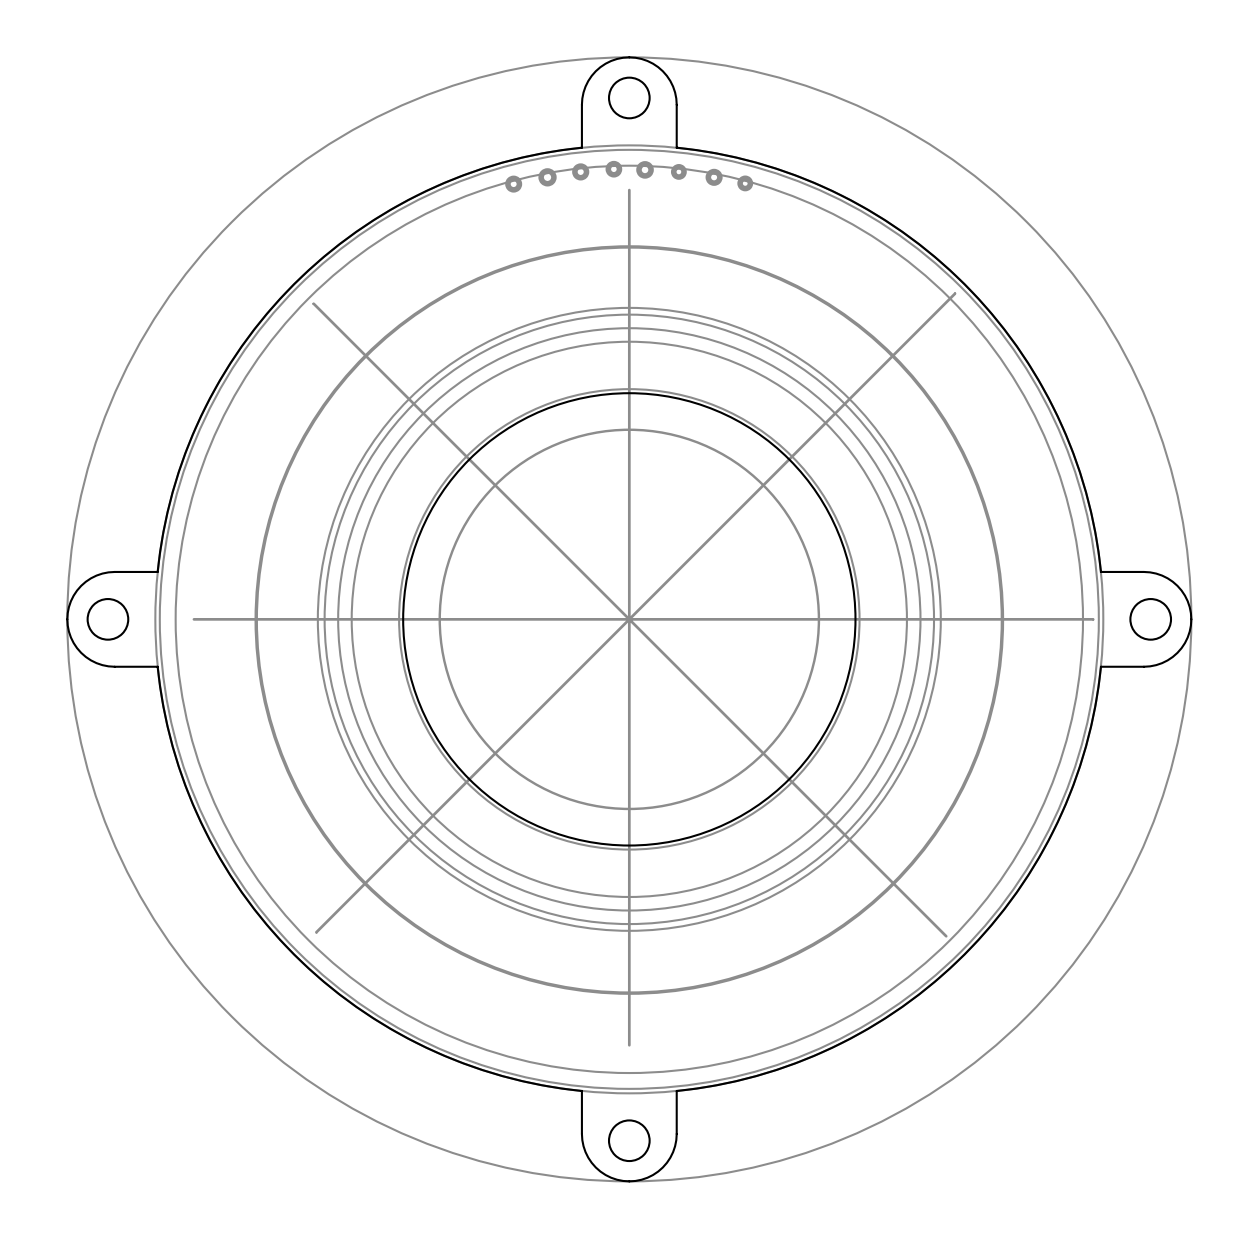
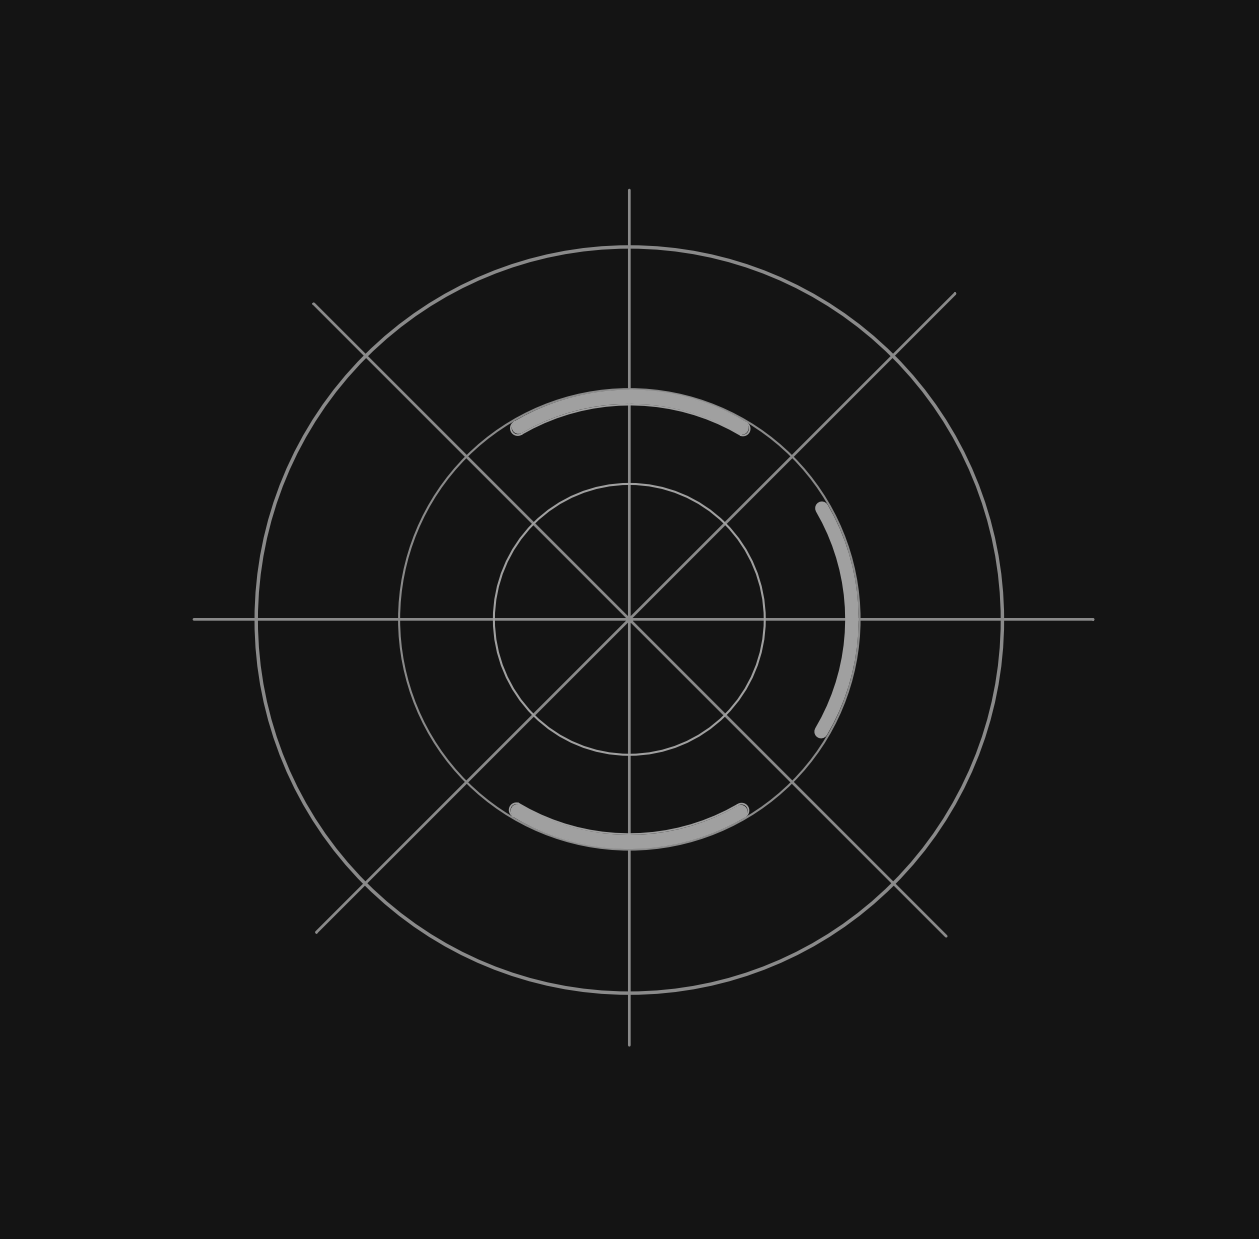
drawing: [66, 56, 1193, 1183] -> none
board edge: (629, 57) (617, 58) (605, 63) (595, 71) (588, 81) (582, 98) (581, 147) (541, 153) (502, 162) (463, 175) (426, 191) (390, 209) (356, 231) (324, 256) (294, 284) (266, 314) (241, 346) (219, 380) (201, 416) (185, 453) (172, 492) (163, 531) (157, 571) (108, 572) (91, 578) (81, 585) (73, 595) (68, 607) (67, 619) (68, 631) (73, 643) (81, 652) (91, 660) (108, 666) (157, 666) (163, 706) (172, 746) (185, 785) (201, 822) (219, 858) (241, 892) (266, 924) (294, 954) (324, 981) (356, 1006) (390, 1028) (426, 1047) (463, 1063) (502, 1076) (541, 1085) (581, 1091) (582, 1140) (588, 1157) (595, 1167) (605, 1175) (617, 1179) (629, 1181) (641, 1179) (653, 1175) (662, 1167) (670, 1157) (676, 1140) (676, 1091) (716, 1085) (756, 1076) (795, 1063) (832, 1047) (868, 1028) (902, 1006) (934, 981) (964, 954) (991, 924) (1016, 892) (1038, 858) (1057, 822) (1073, 785) (1086, 746) (1095, 706) (1101, 666) (1150, 666) (1167, 660) (1177, 652) (1184, 643) (1189, 631) (1191, 619) (1189, 607) (1184, 595) (1177, 585) (1167, 578) (1150, 572) (1101, 571) (1095, 531) (1086, 492) (1073, 453) (1057, 416) (1038, 380) (1016, 346) (991, 314) (964, 284) (934, 256) (902, 231) (868, 209) (832, 191) (795, 175) (756, 162) (716, 153) (676, 147) (676, 98) (670, 81) (662, 71) (653, 63) (641, 58) (629, 57) -> none
round board edge: [607, 76, 651, 120] -> none
part: (629, 176) -> none
board edge: none -> (630, 390) (668, 393) (703, 402) (746, 422) (749, 430) (746, 434) (741, 435) (706, 418) (682, 410) (657, 406) (631, 404) (606, 405) (568, 413) (544, 422) (519, 434) (514, 434) (511, 430) (511, 426) (514, 422) (558, 402) (593, 393) (630, 390)
round board edge size: [402, 392, 857, 847] -> [492, 482, 766, 756]
board edge: none -> (518, 427) (541, 415) (566, 406) (604, 398) (630, 397) (656, 398) (694, 406) (718, 415) (741, 427)
board edge: none -> (821, 508) (833, 531) (842, 555) (848, 581) (851, 620) (850, 646) (845, 671) (837, 696) (821, 731)
round board edge: [86, 598, 130, 641] -> none
round board edge: [1129, 598, 1173, 641] -> none
board edge: none -> (518, 803) (510, 806) (510, 813) (534, 827) (579, 842) (615, 847) (653, 846) (689, 840) (734, 822) (745, 815) (748, 810) (746, 805) (739, 803) (714, 816) (690, 825) (653, 832) (627, 834) (602, 832) (564, 824) (540, 815) (518, 803)
board edge: none -> (517, 810) (540, 822) (564, 831) (603, 840) (628, 841) (654, 840) (693, 832) (717, 823) (740, 811)
round board edge: [607, 1119, 651, 1163] -> none

